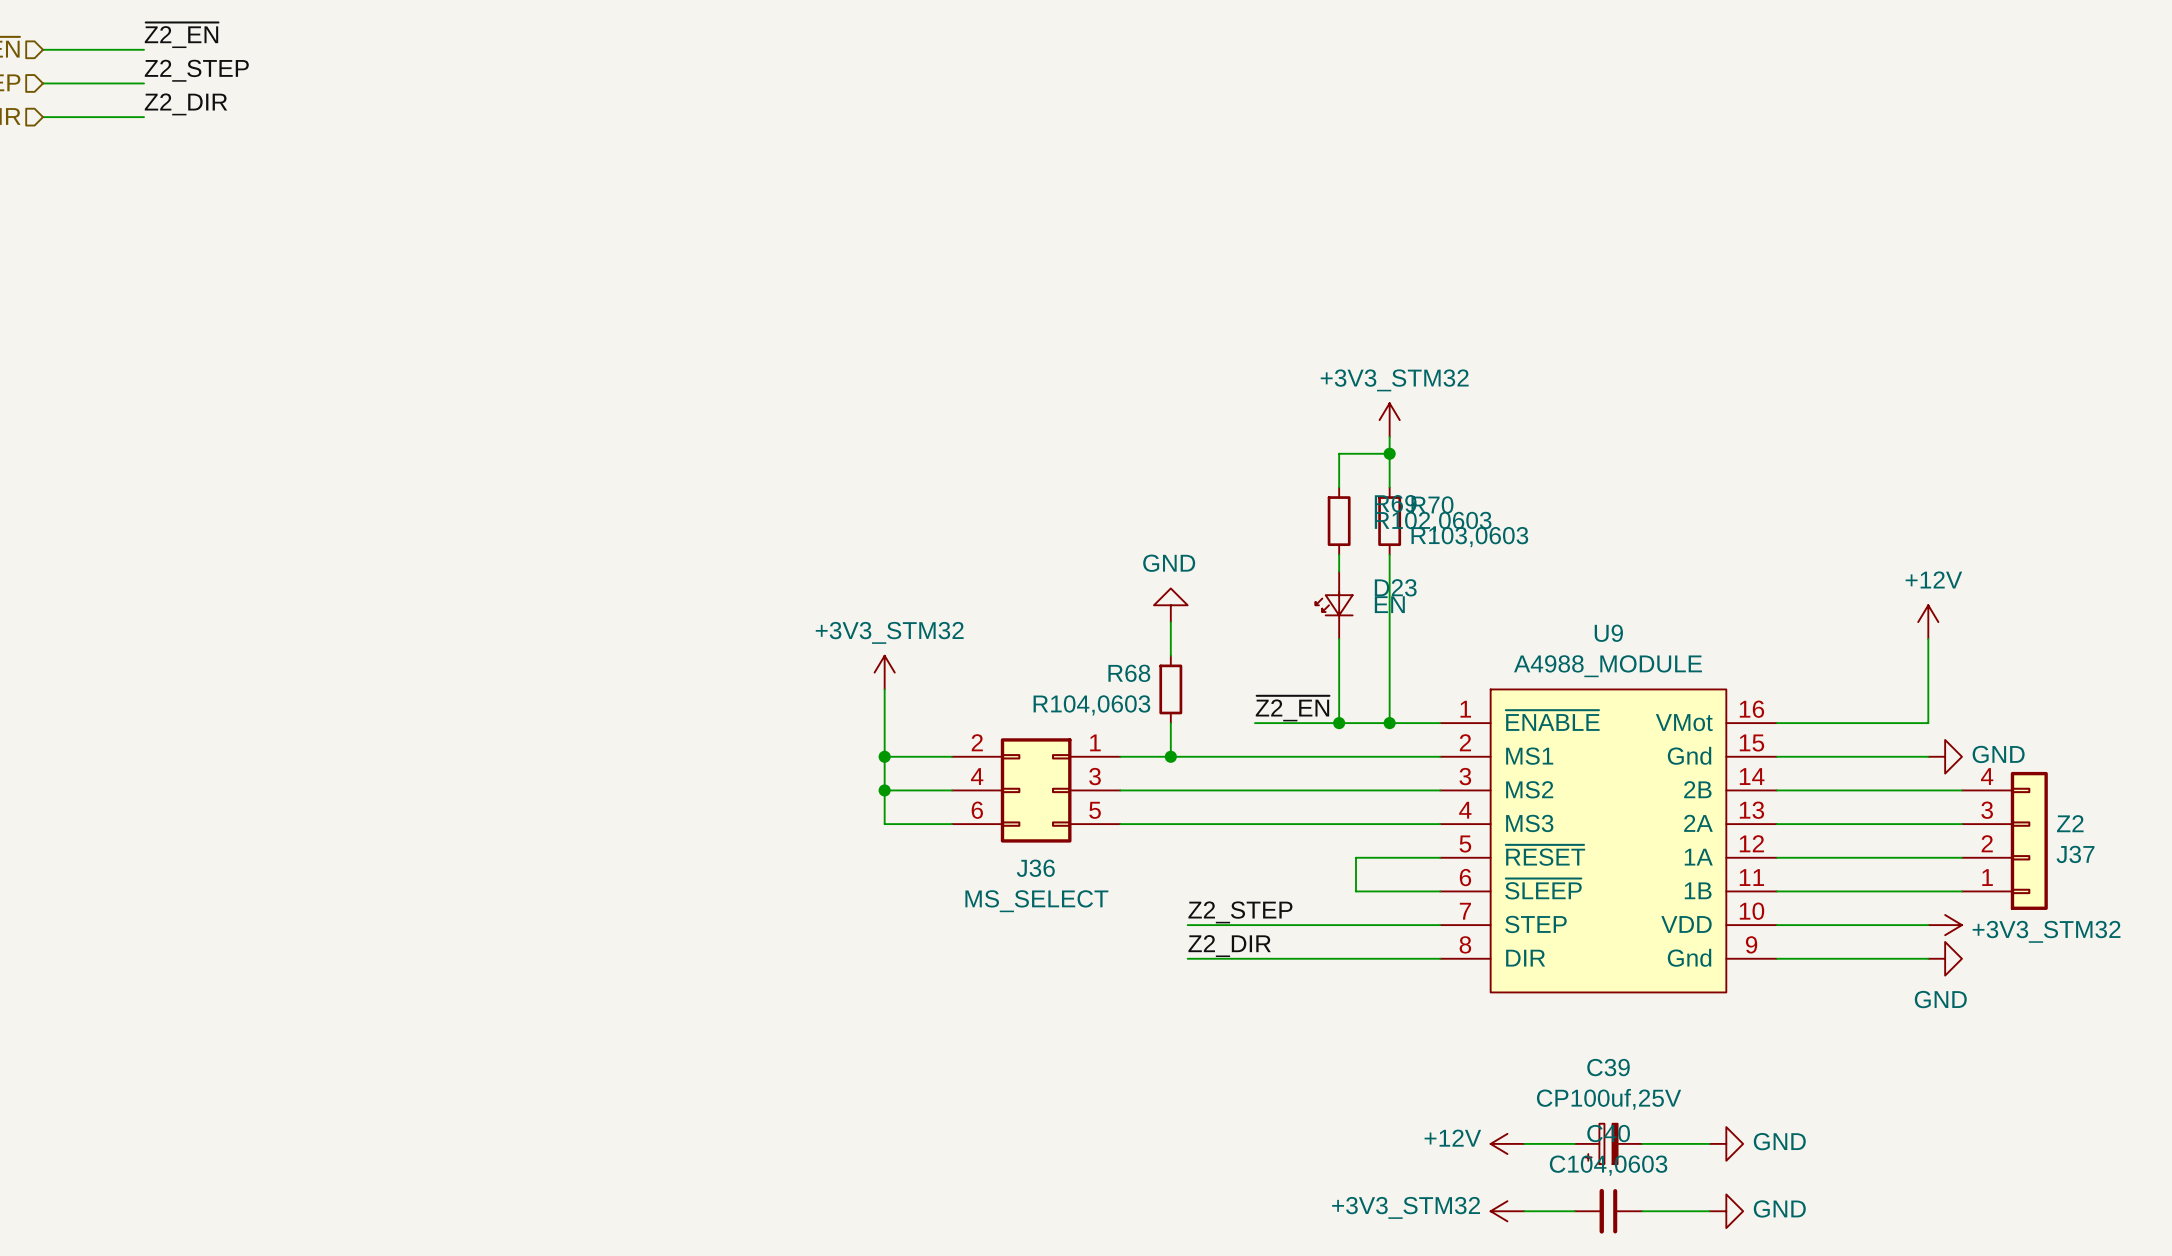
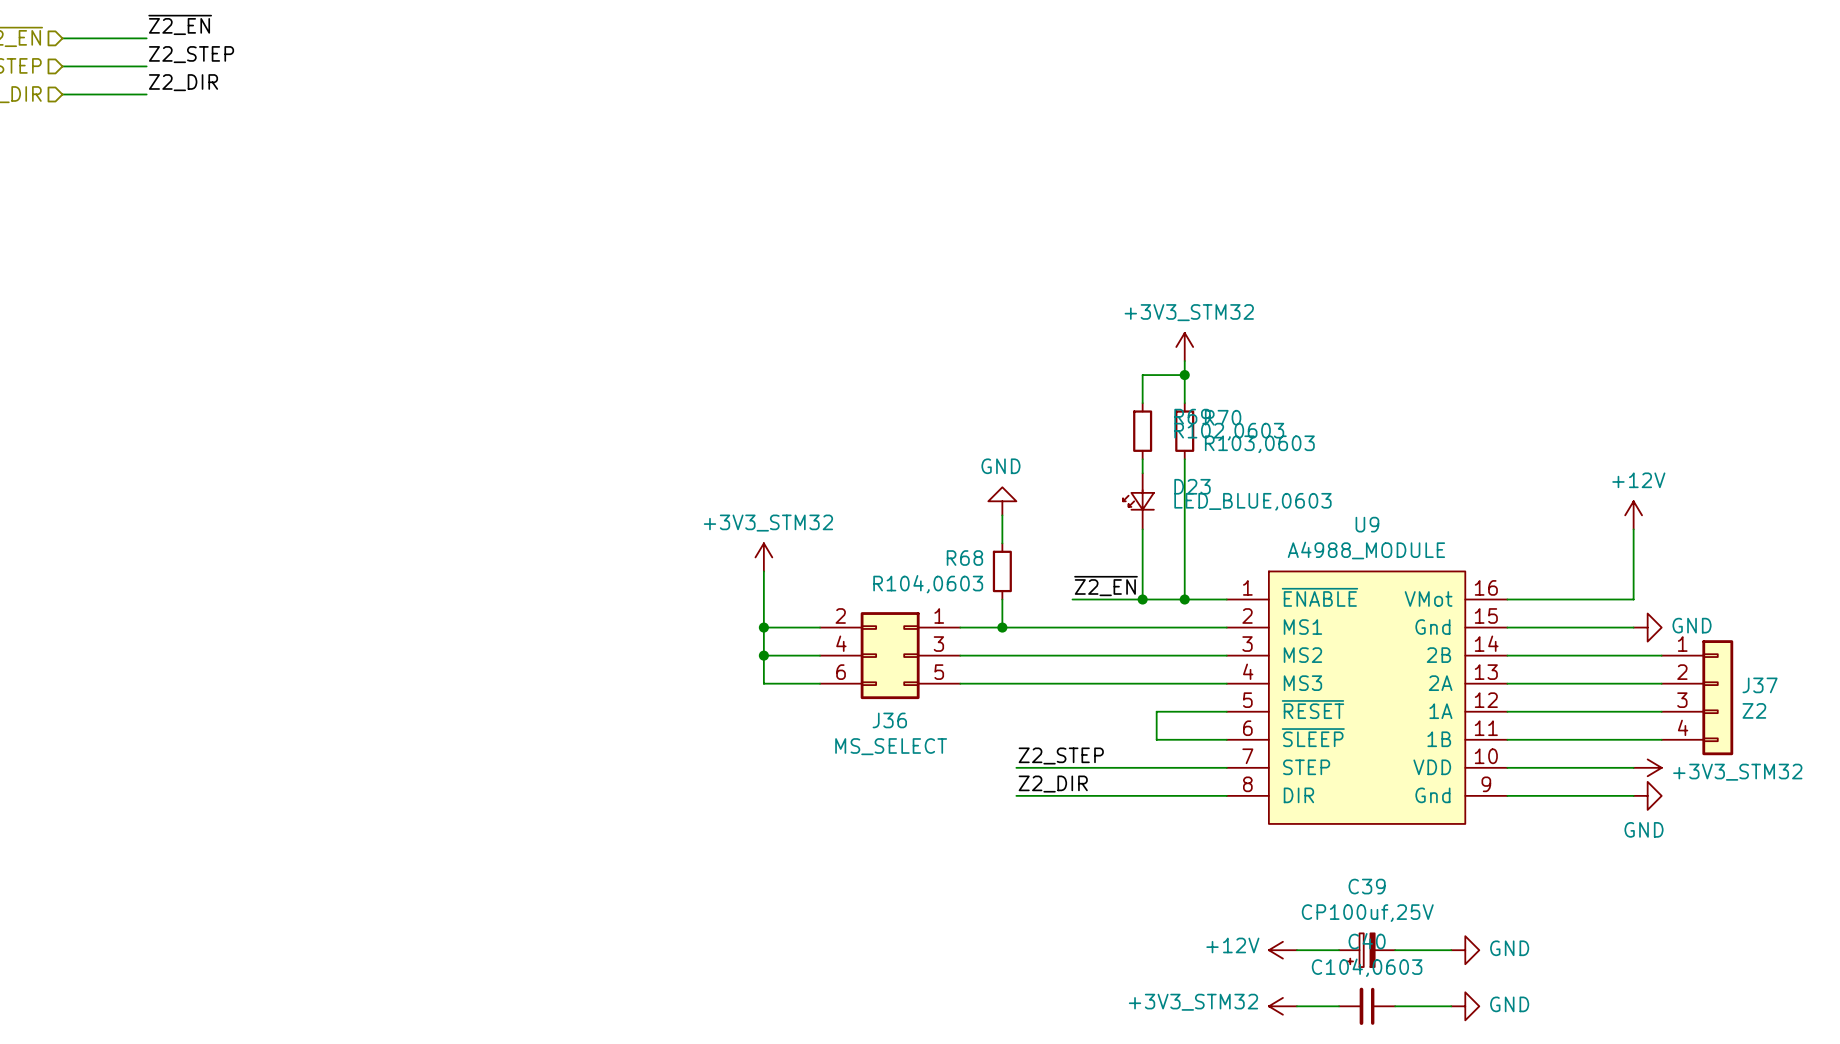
D23 value: EN (1389, 604) -> LED_BLUE,0603 (1252, 501)
J37 flip: as is (2029, 840) -> up-down (1717, 697)

